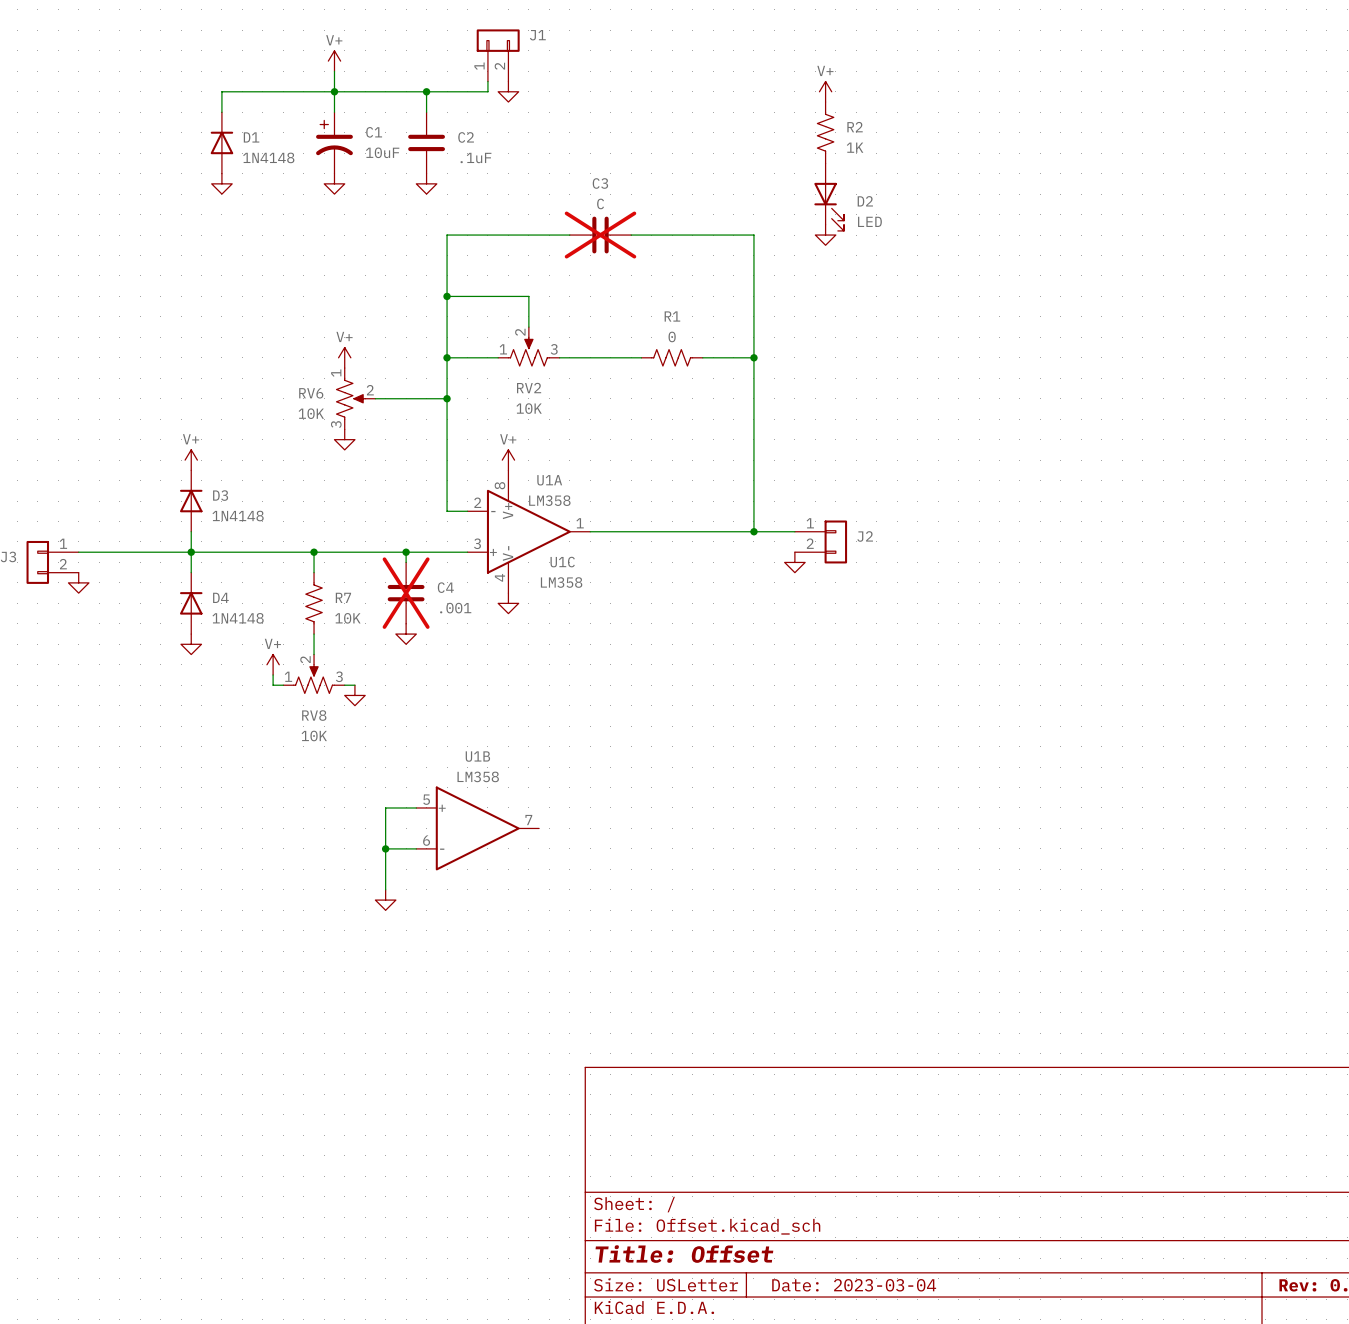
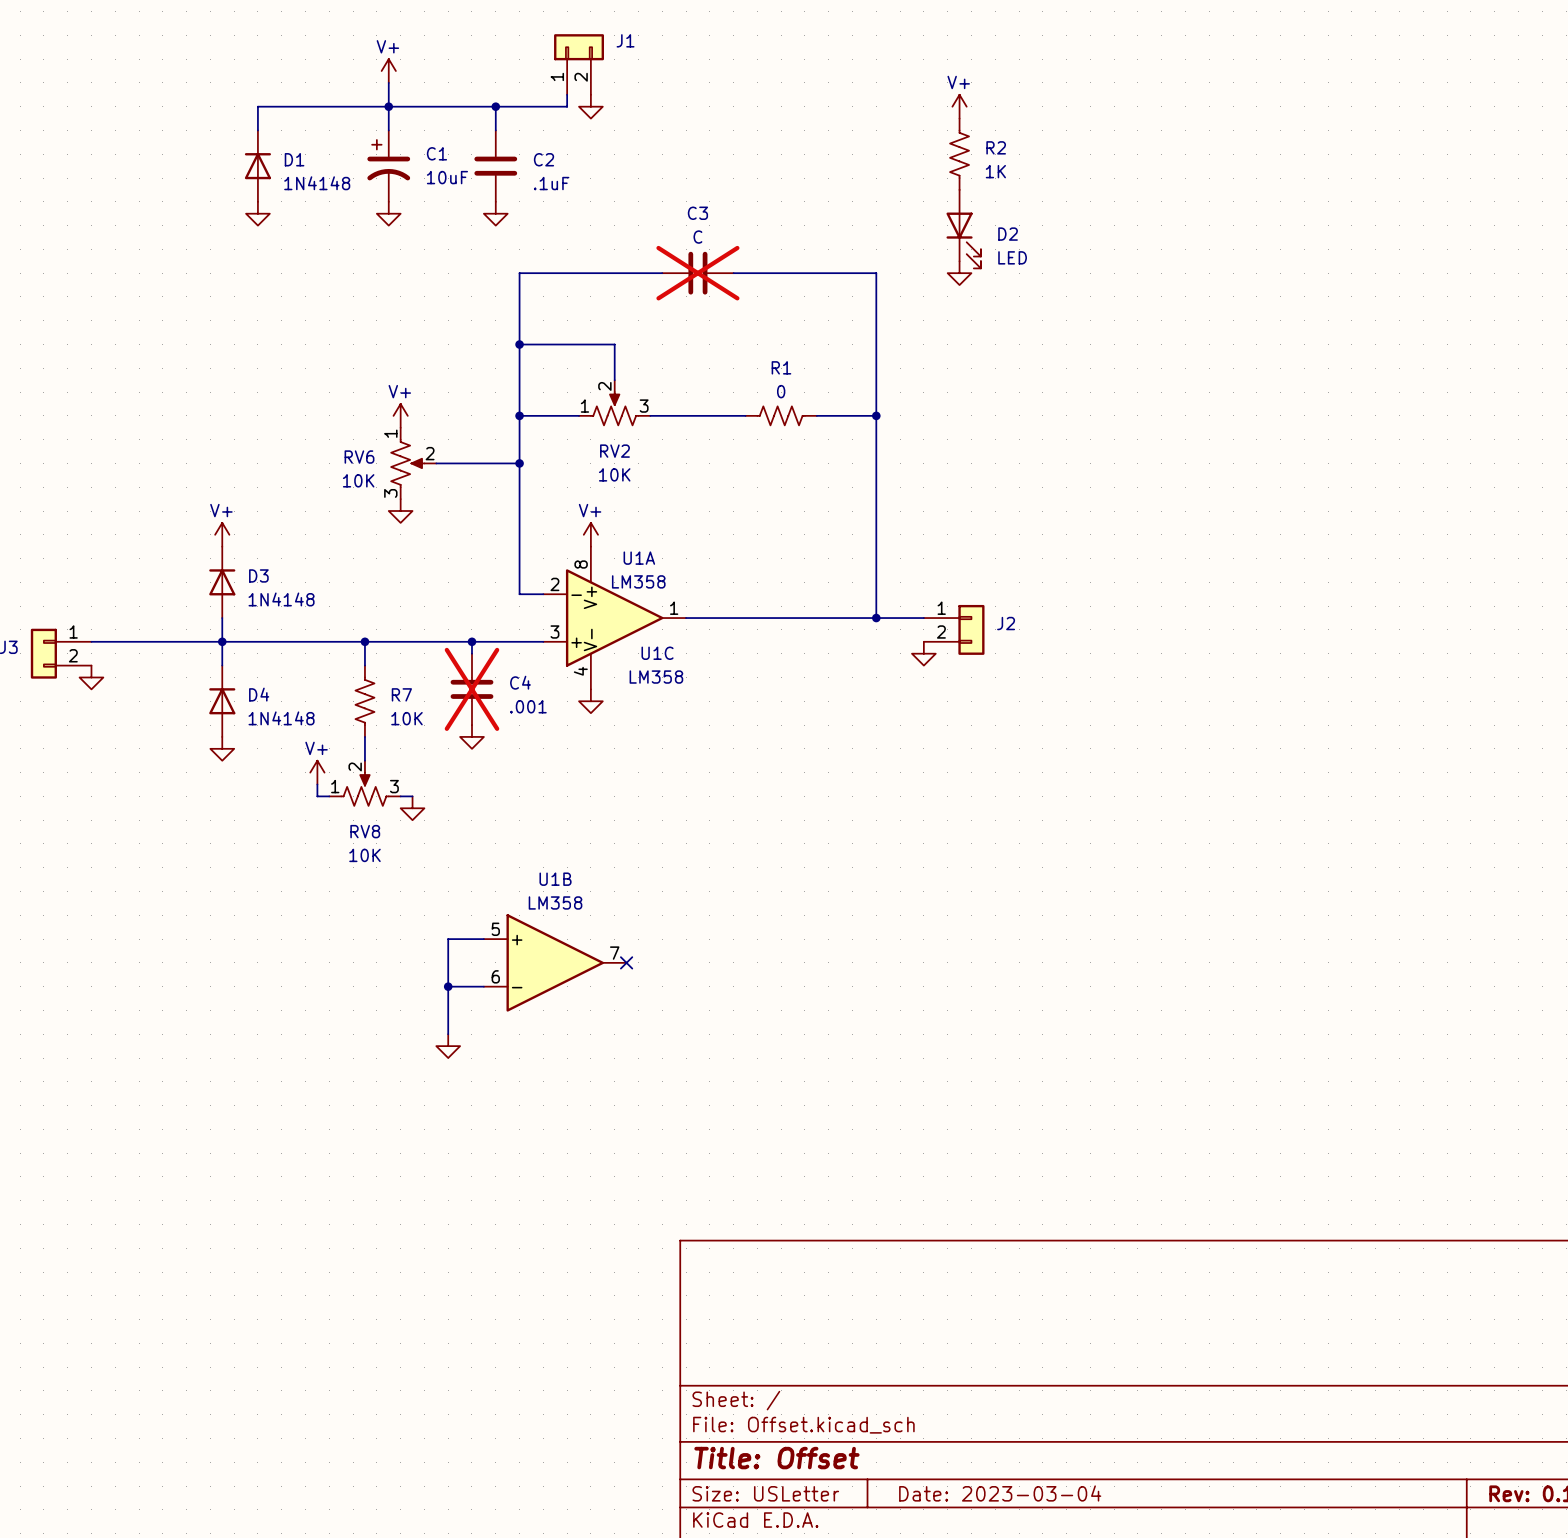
no-connect mark: none -> (626, 962)

